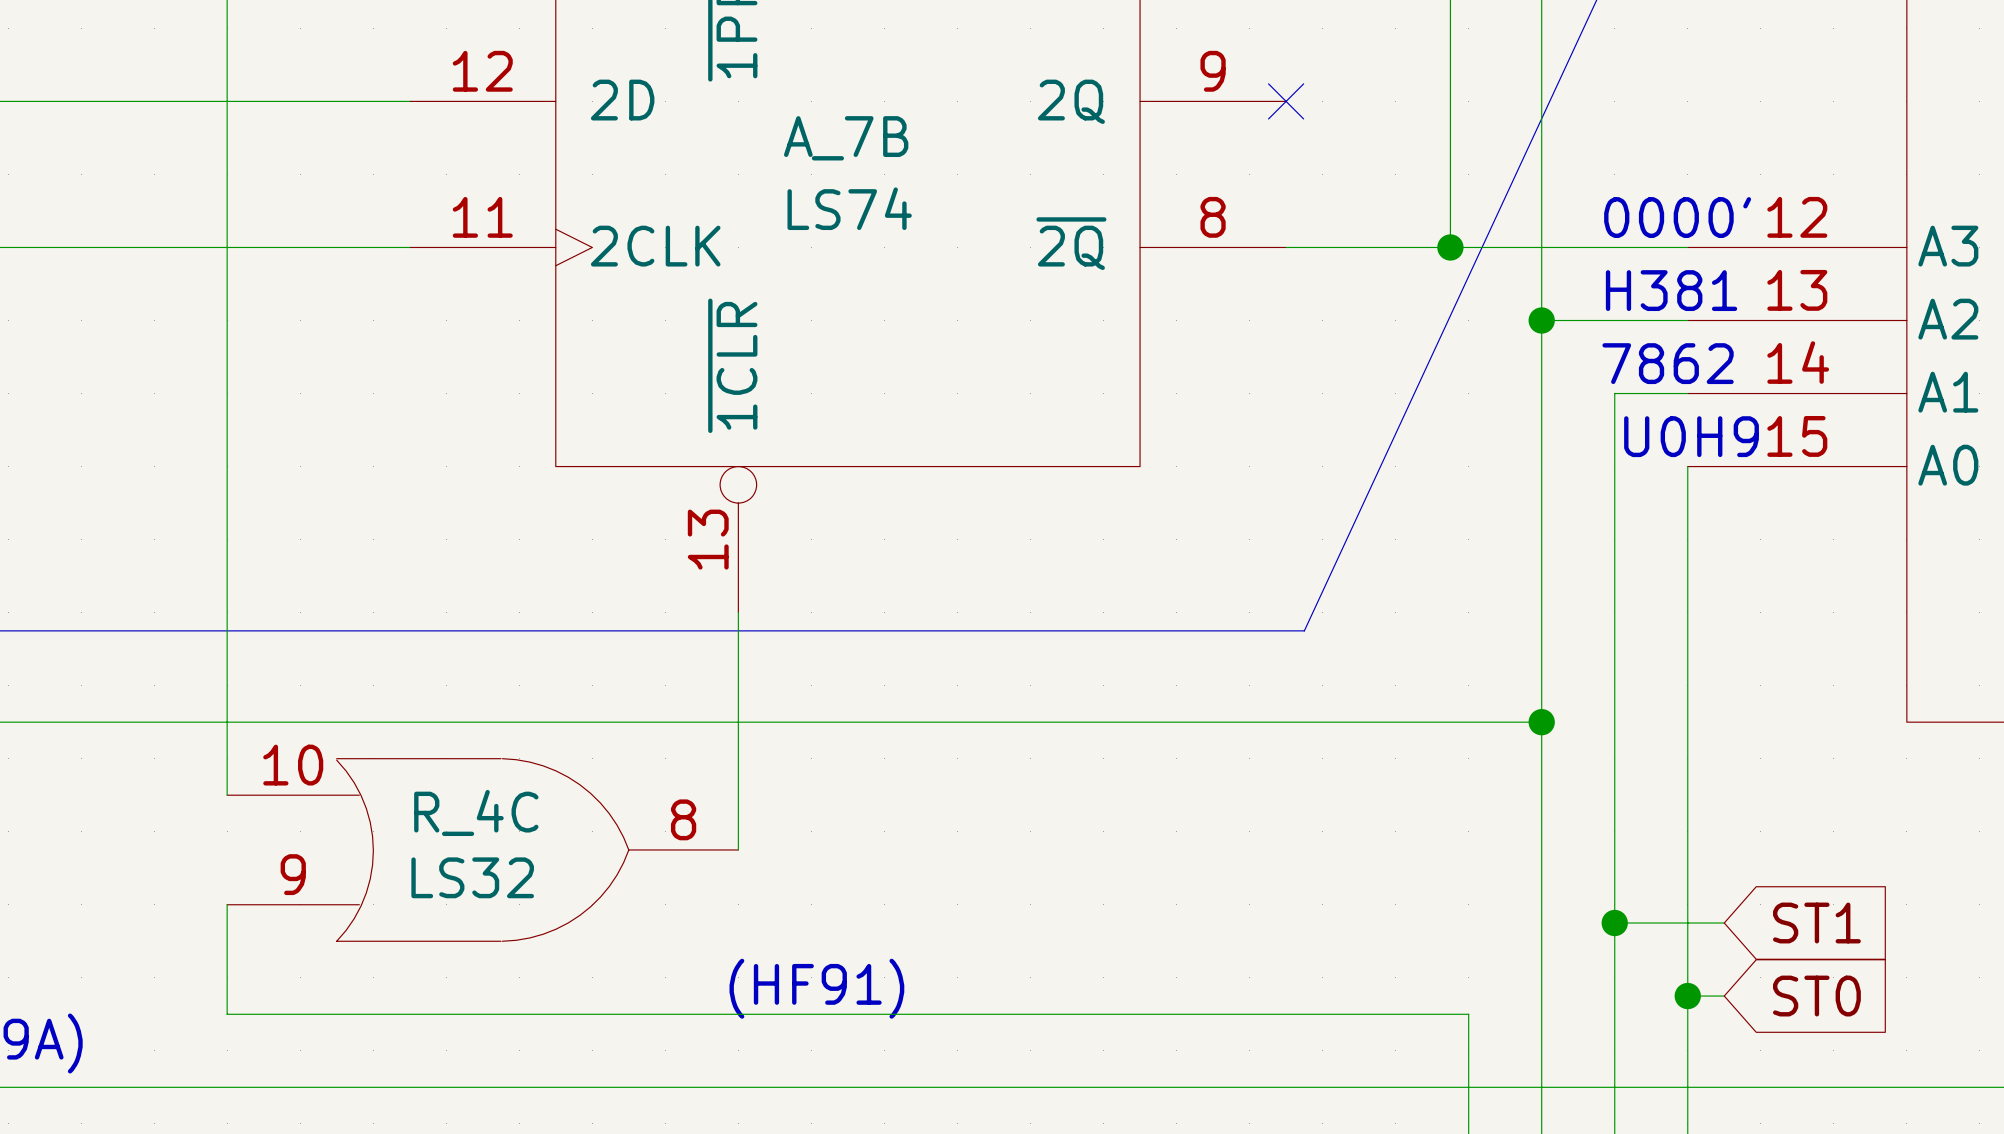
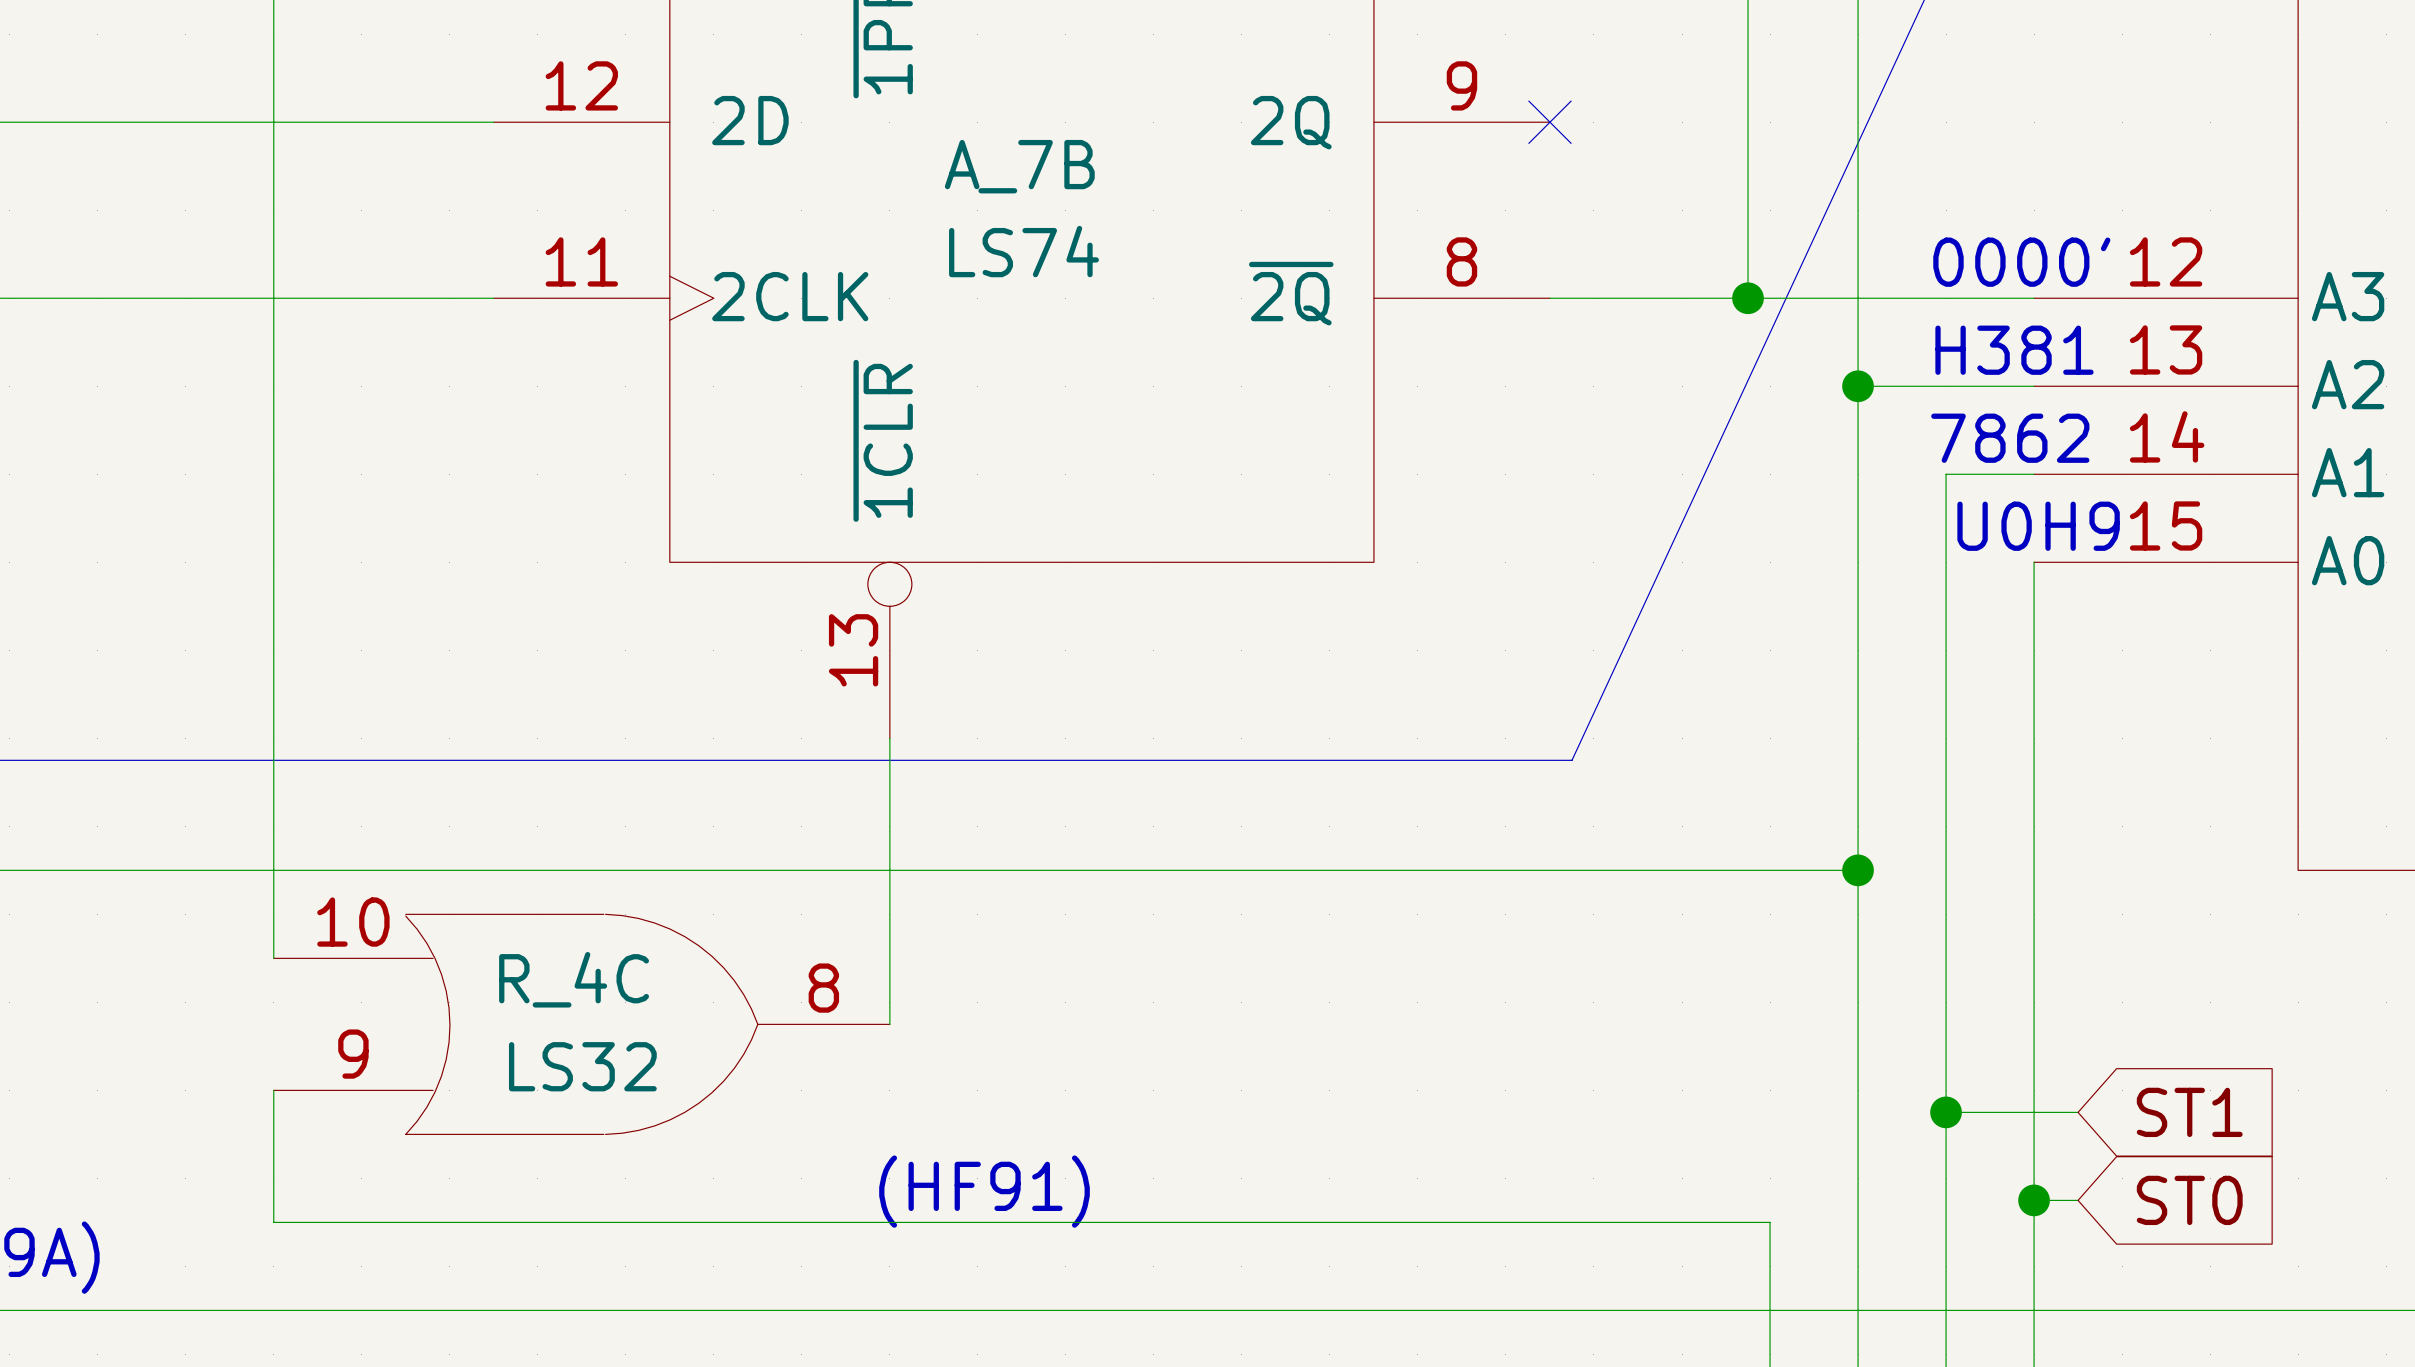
R_4C value position: LS32 (472, 877) -> LS32 (582, 1066)

